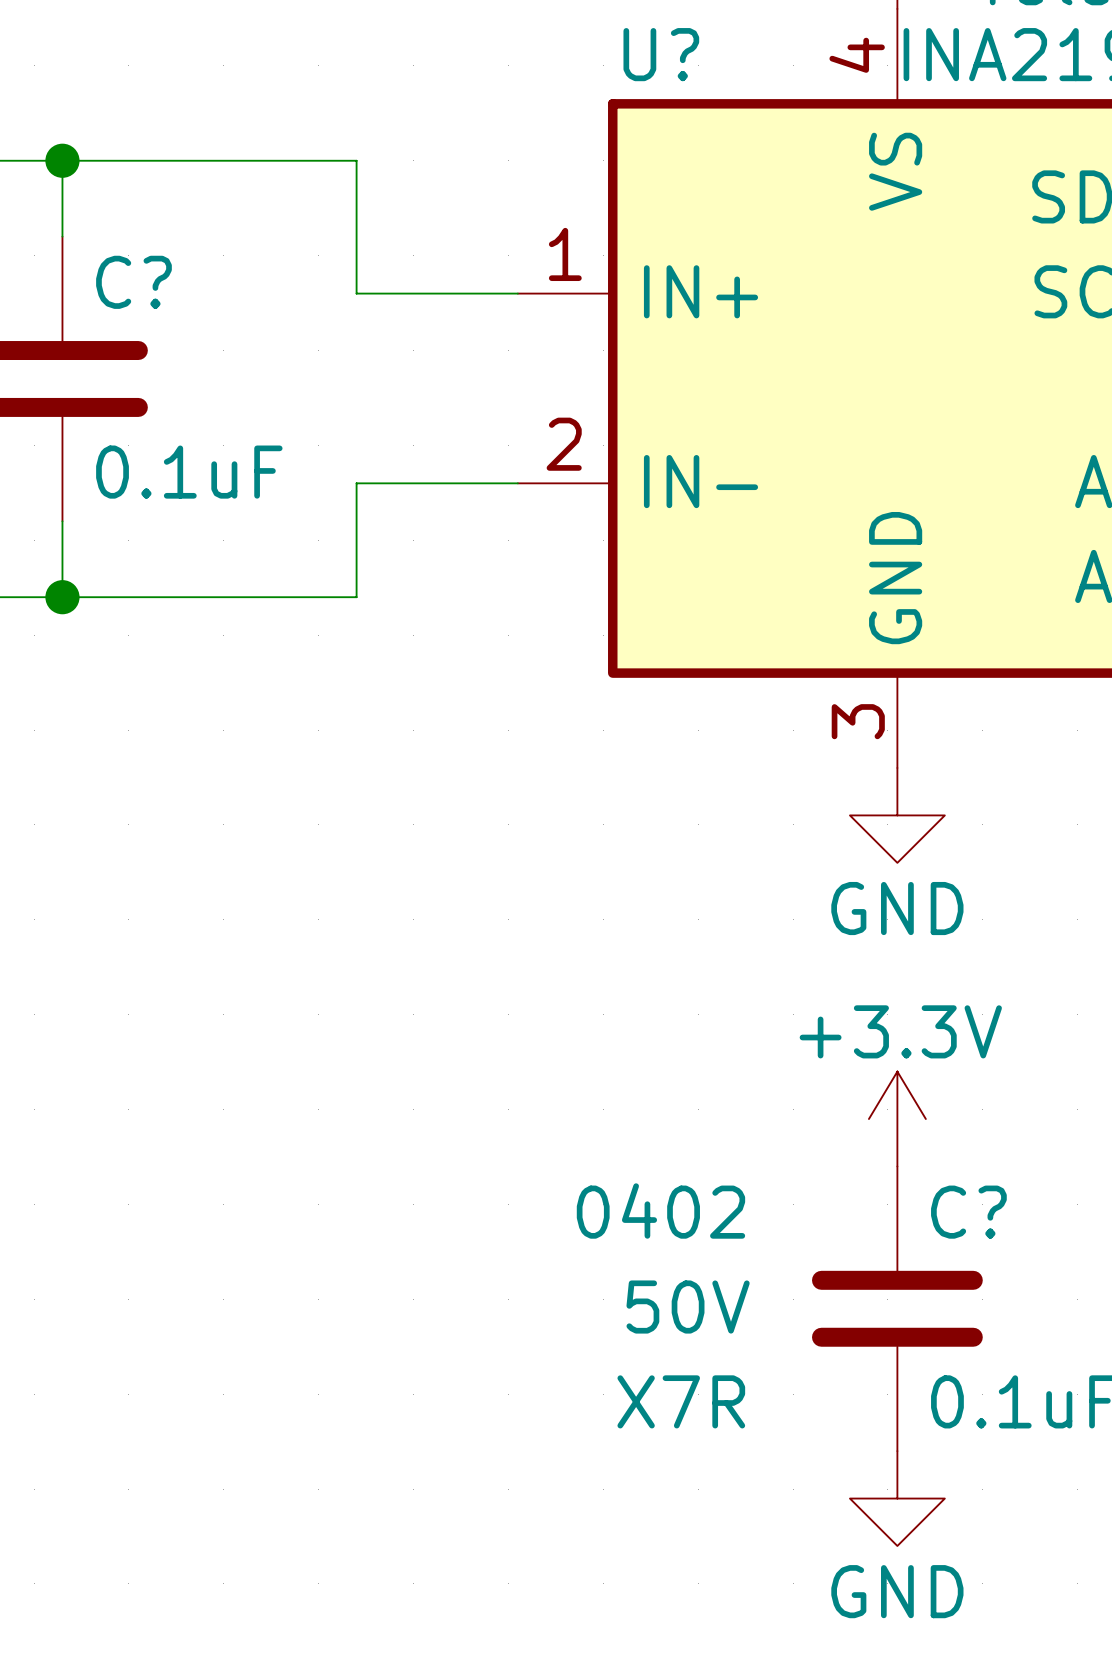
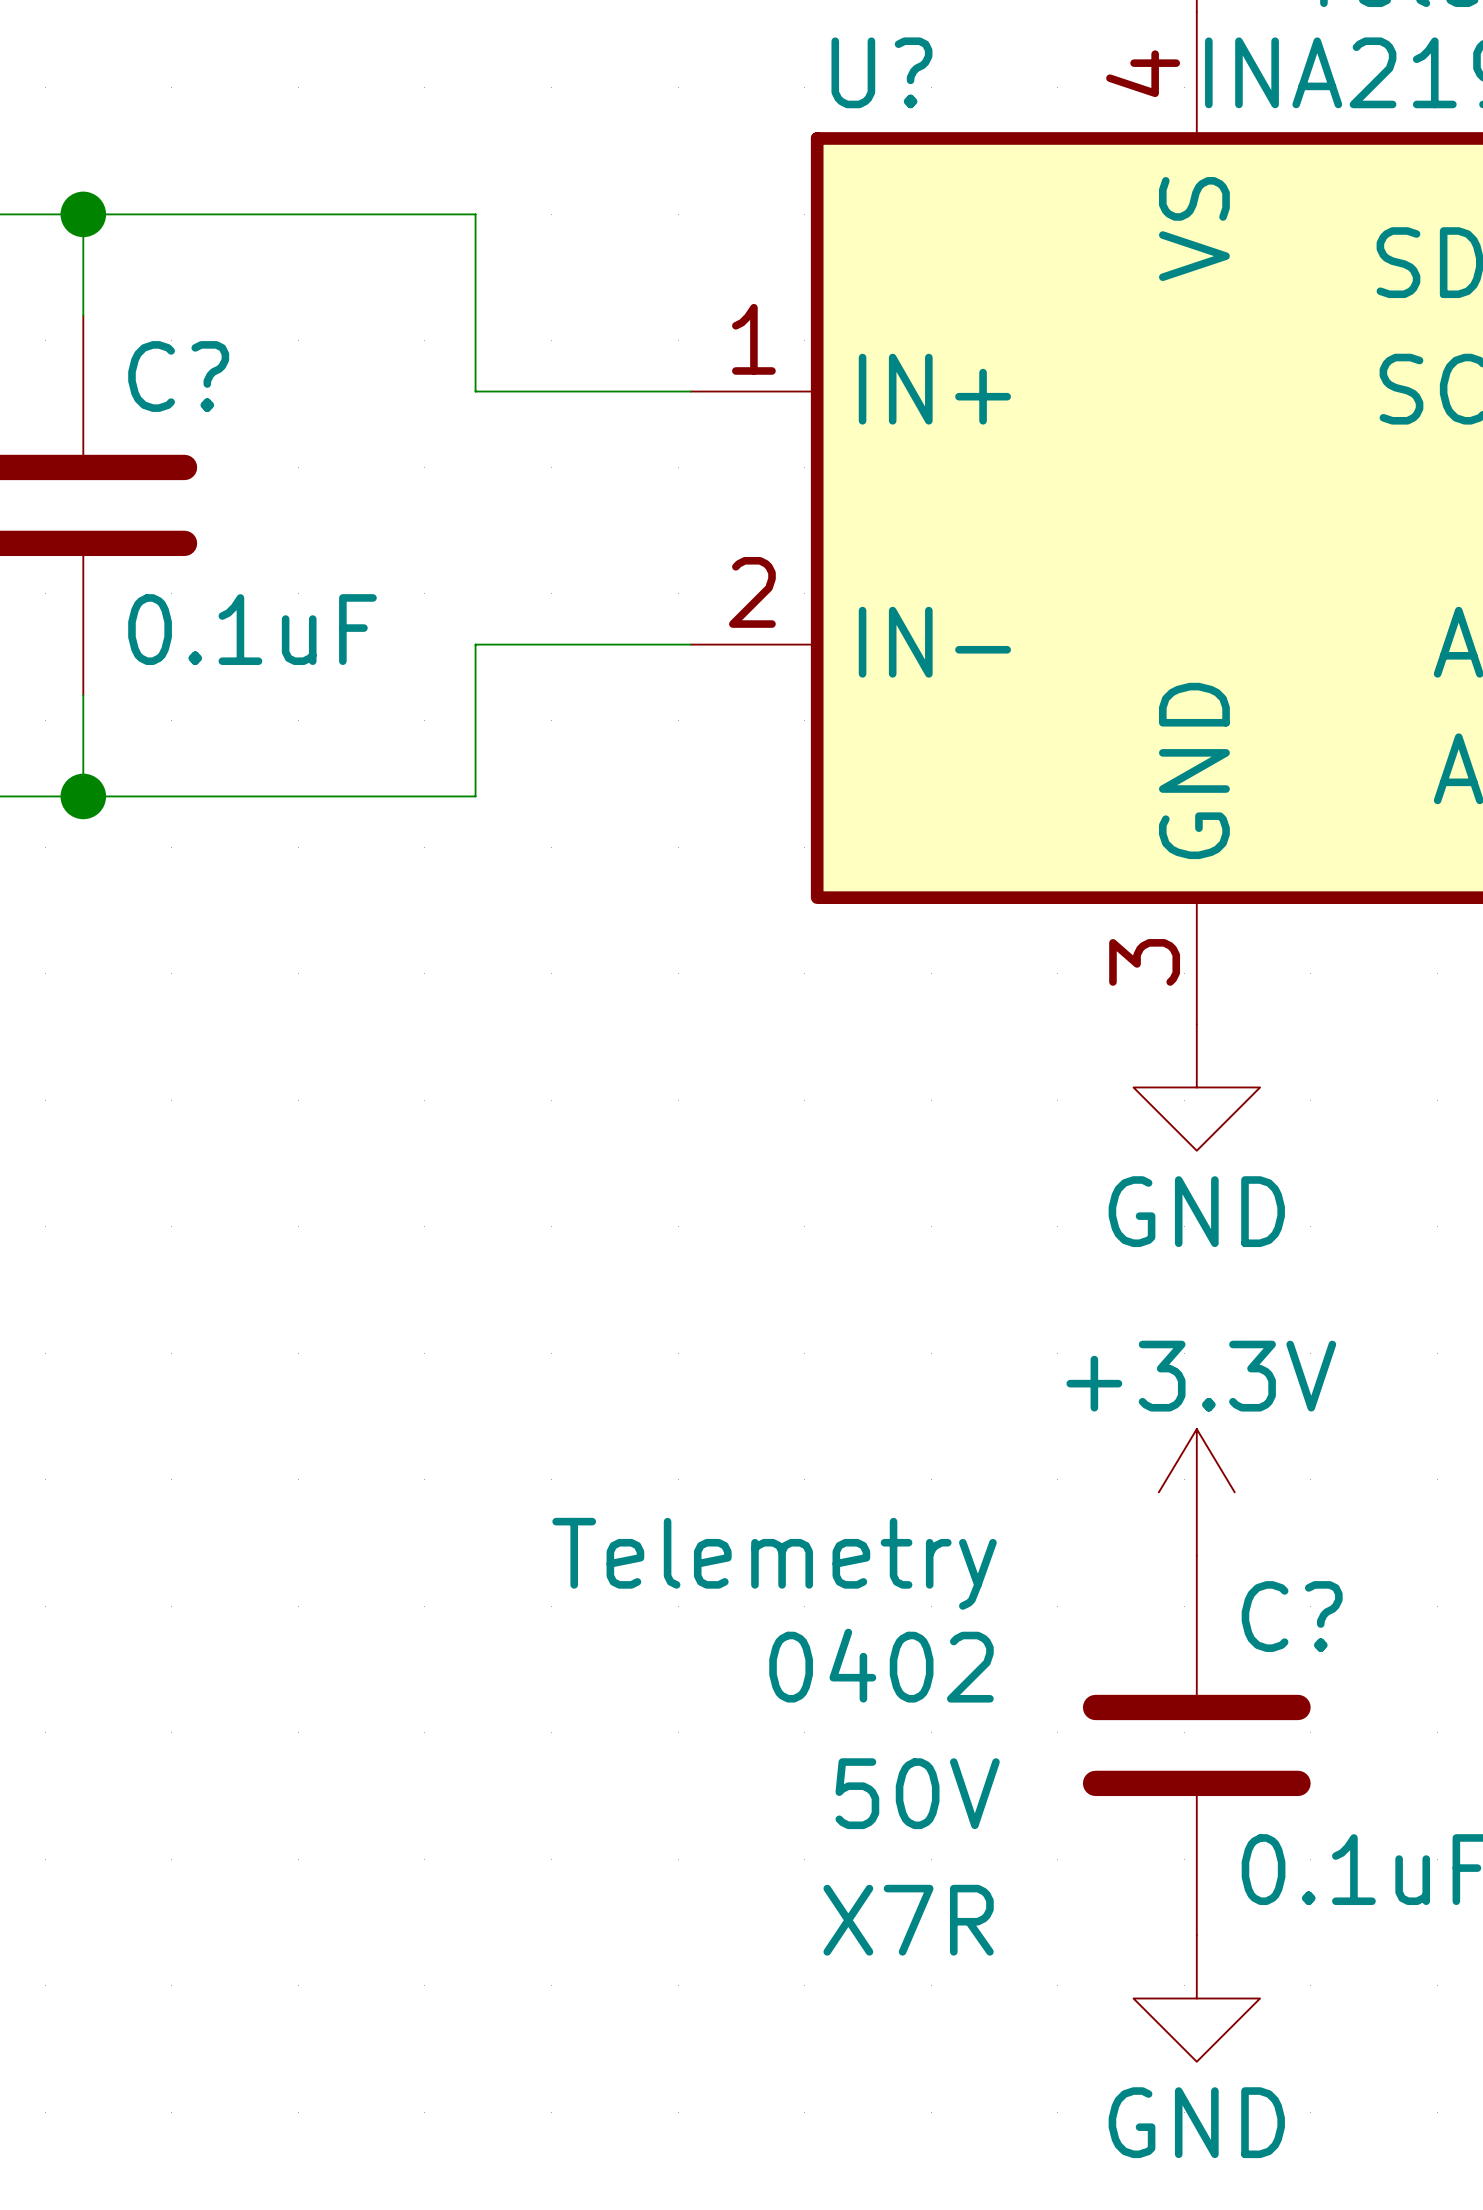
C? text: none -> Telemetry (774, 1563)
C? text position: 0402 (660, 1211) -> 0402 (881, 1665)
C? text position: 50V (688, 1307) -> 50V (917, 1793)
C? text position: X7R (681, 1401) -> X7R (908, 1920)

